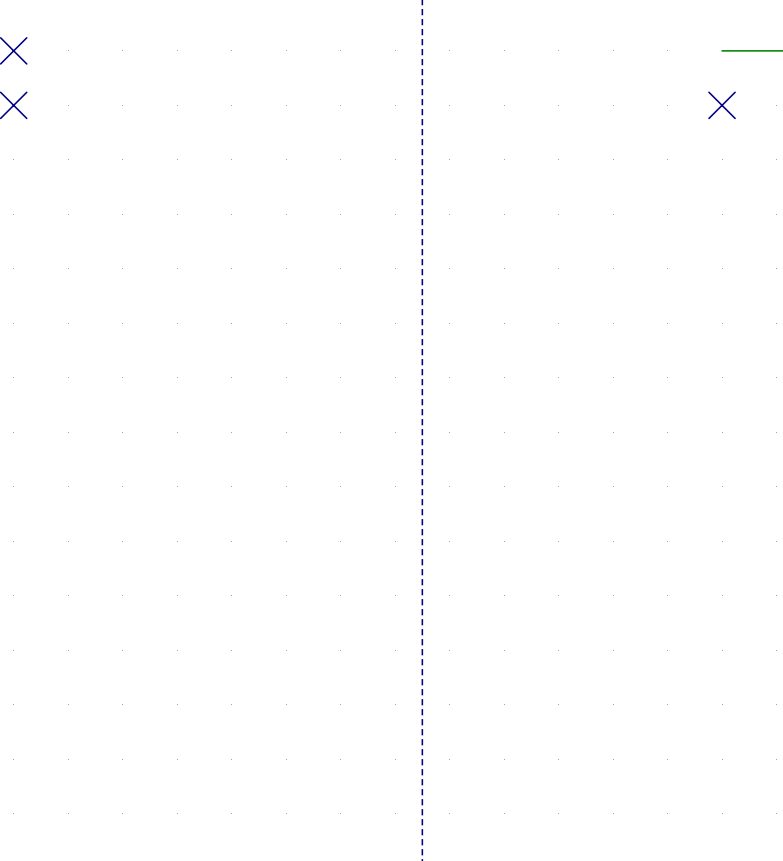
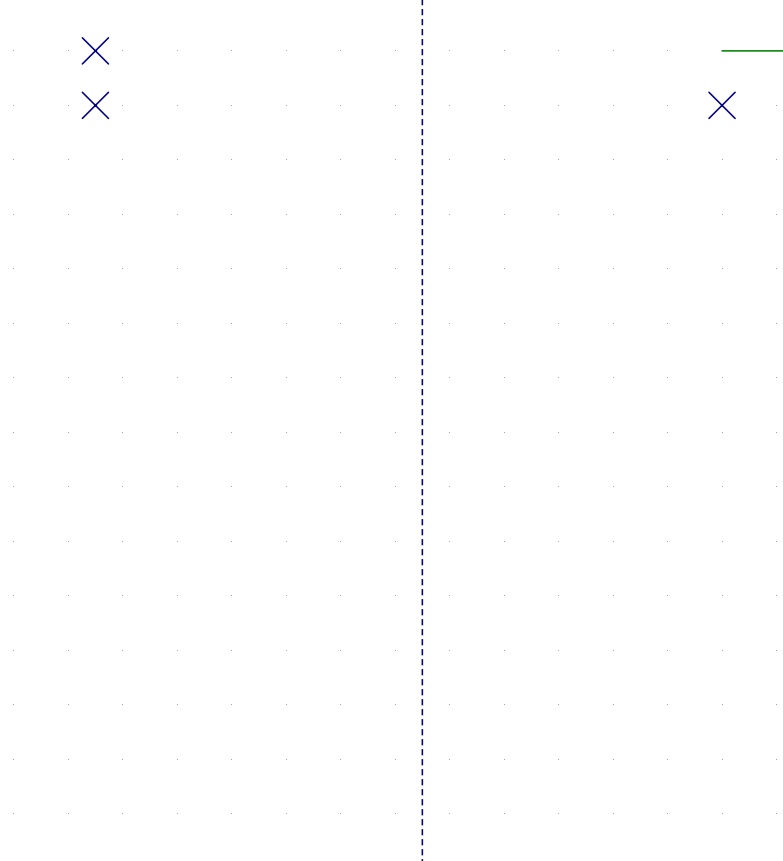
no-connect mark: (13, 50) -> none
no-connect mark: none -> (95, 50)
no-connect mark: (13, 105) -> none
no-connect mark: none -> (95, 105)

